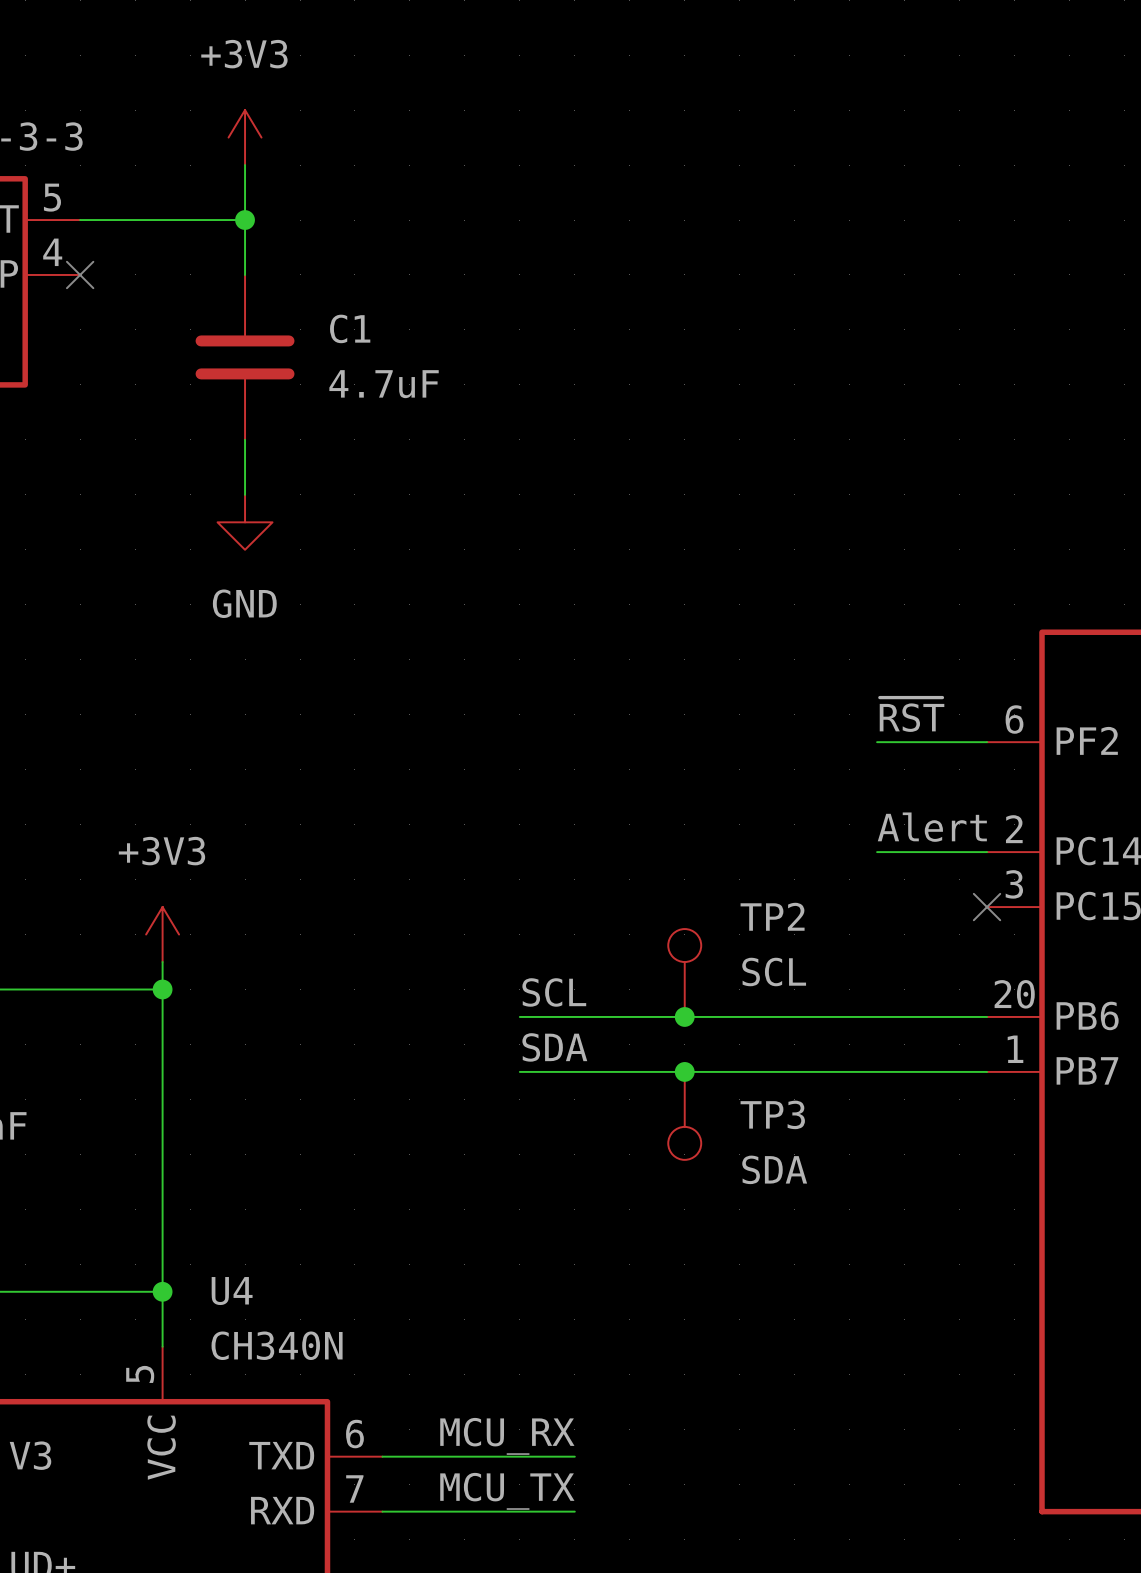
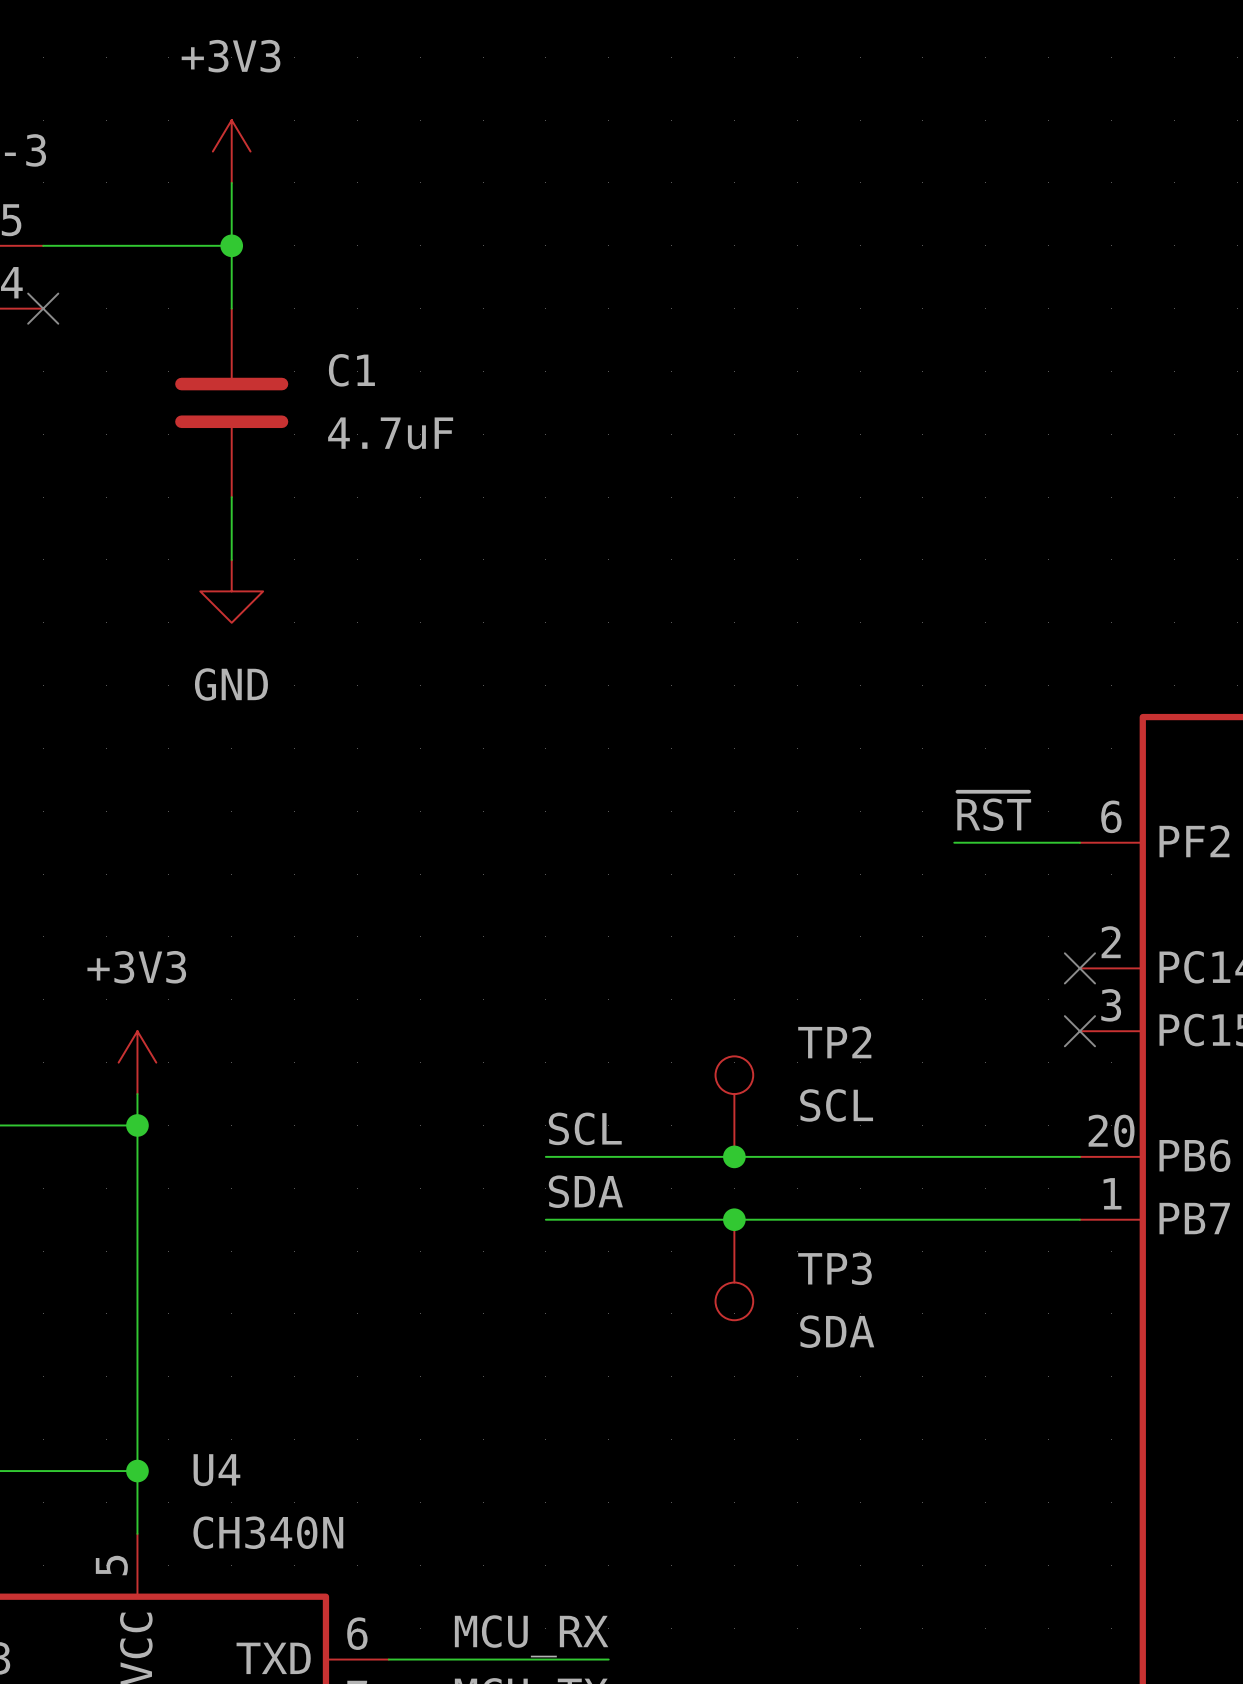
label: Alert (932, 827) -> none
wire: (877, 852) (987, 852) -> none
no-connect mark: none -> (1079, 968)

